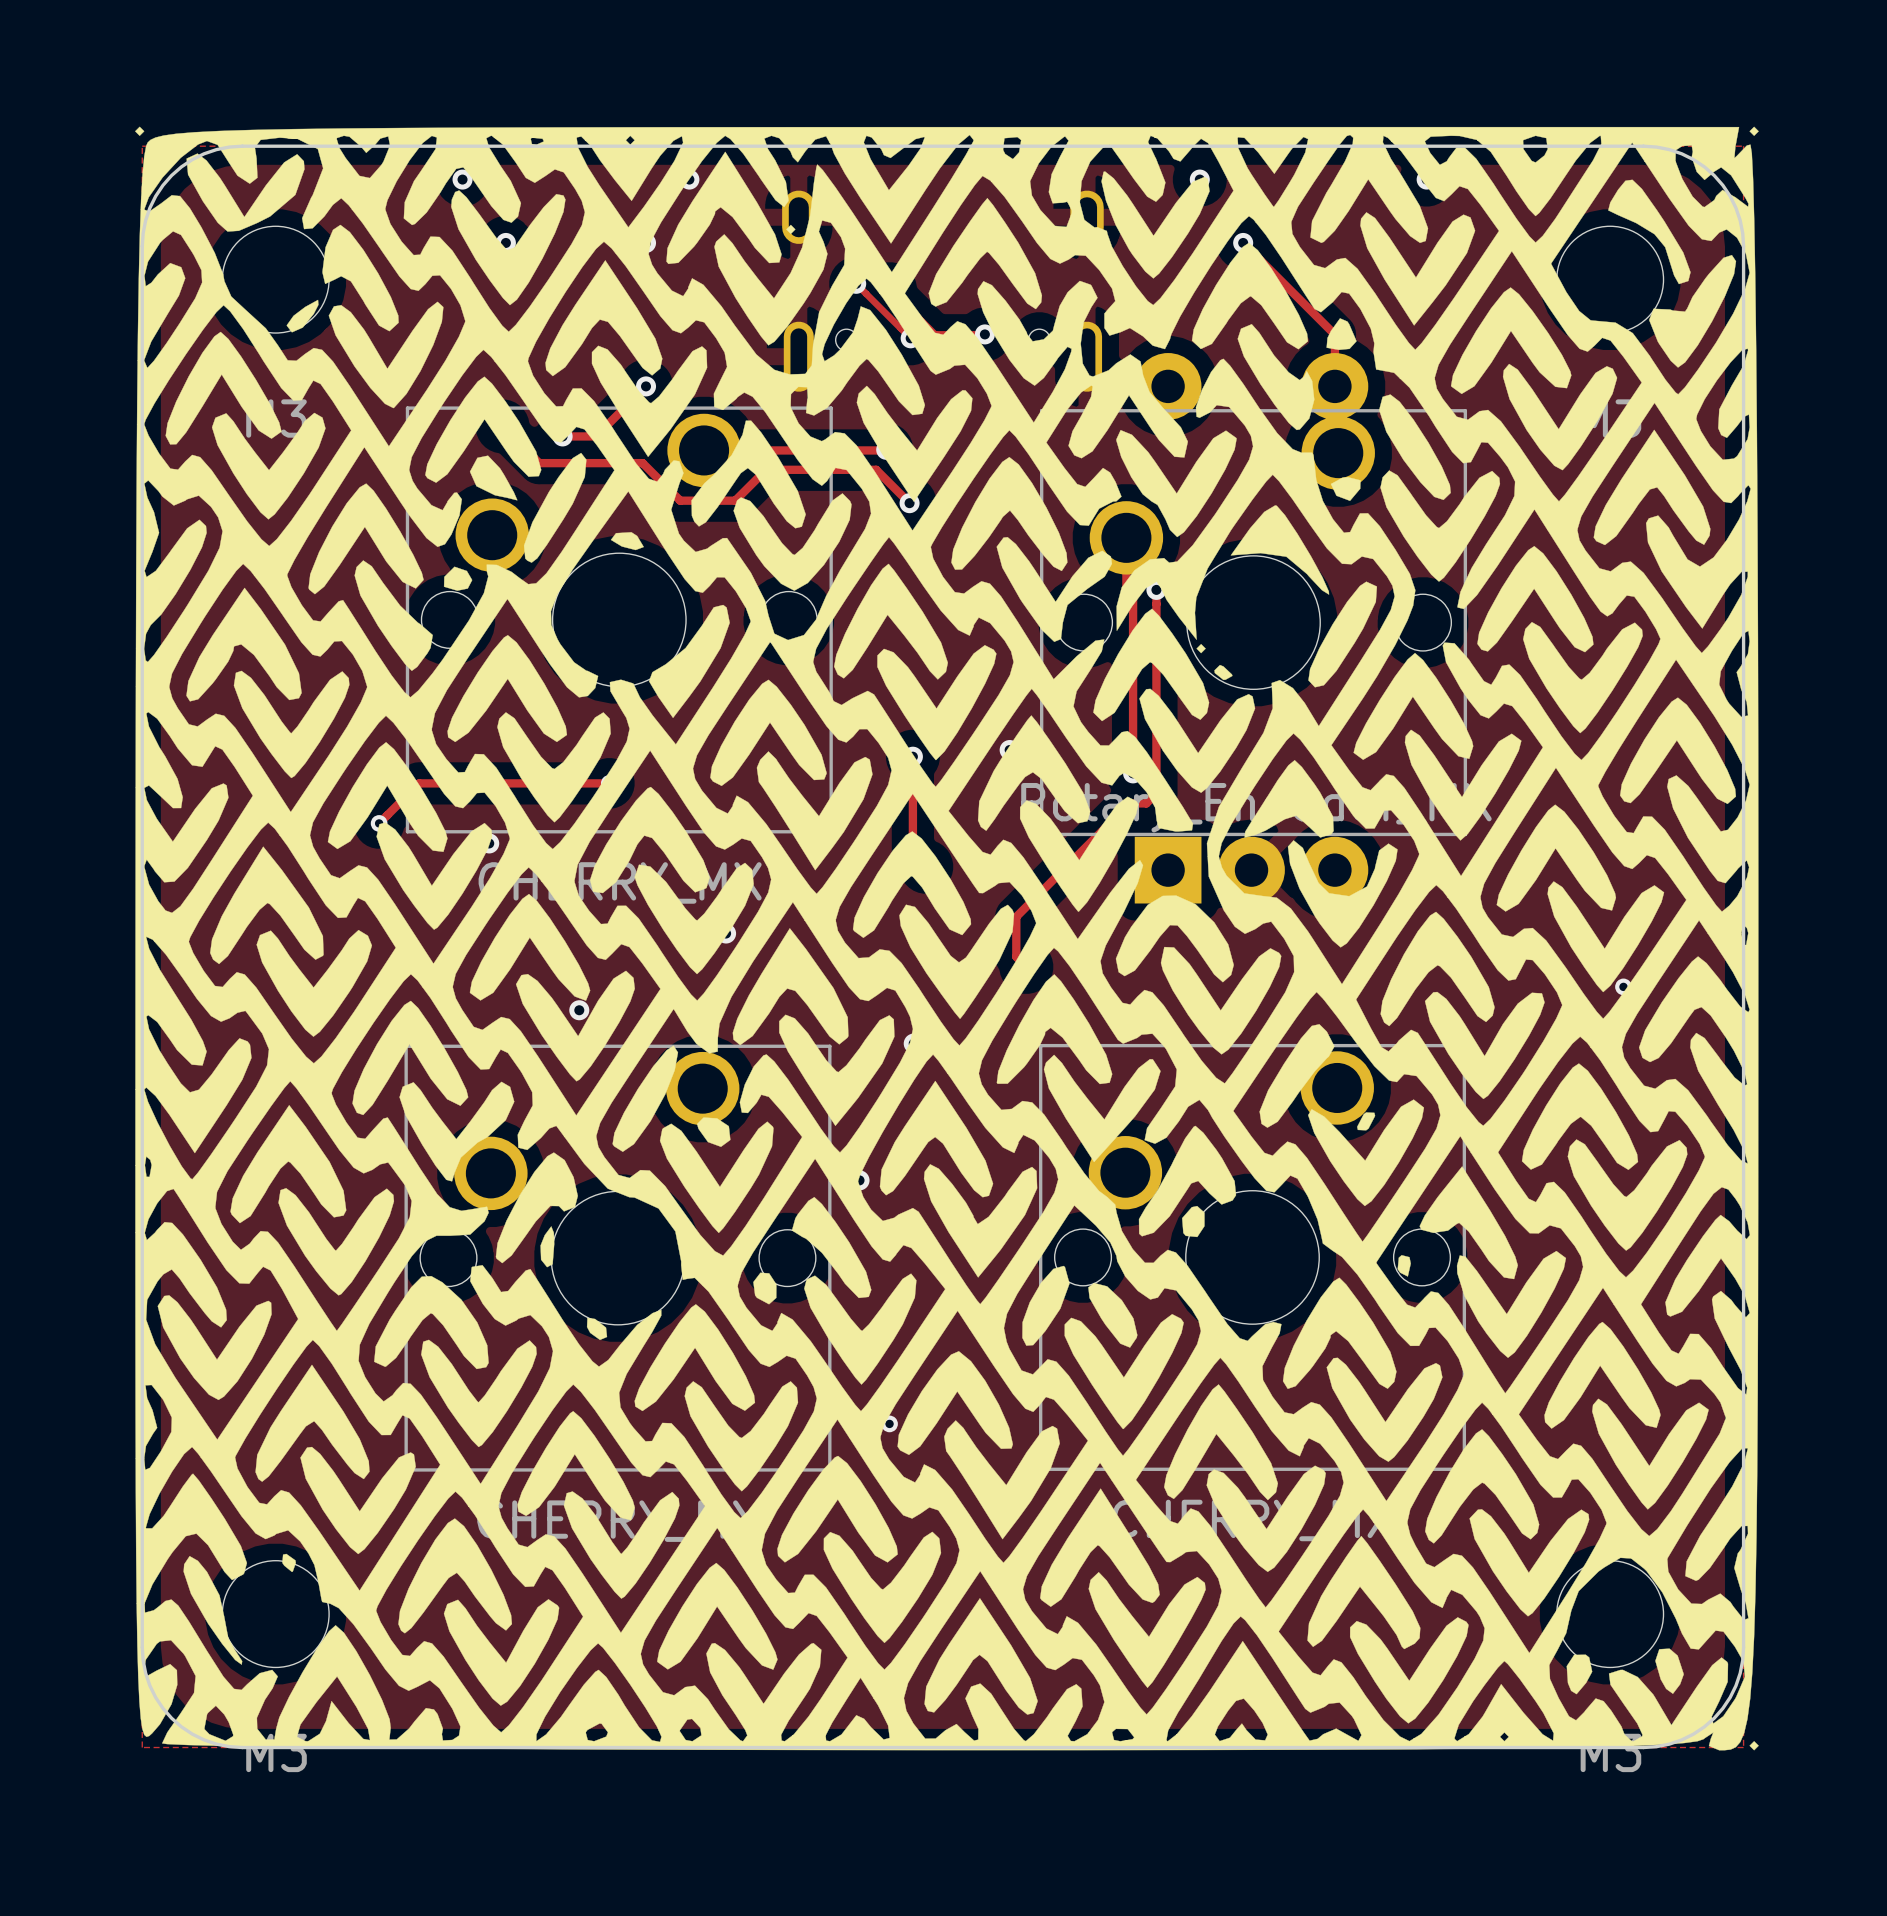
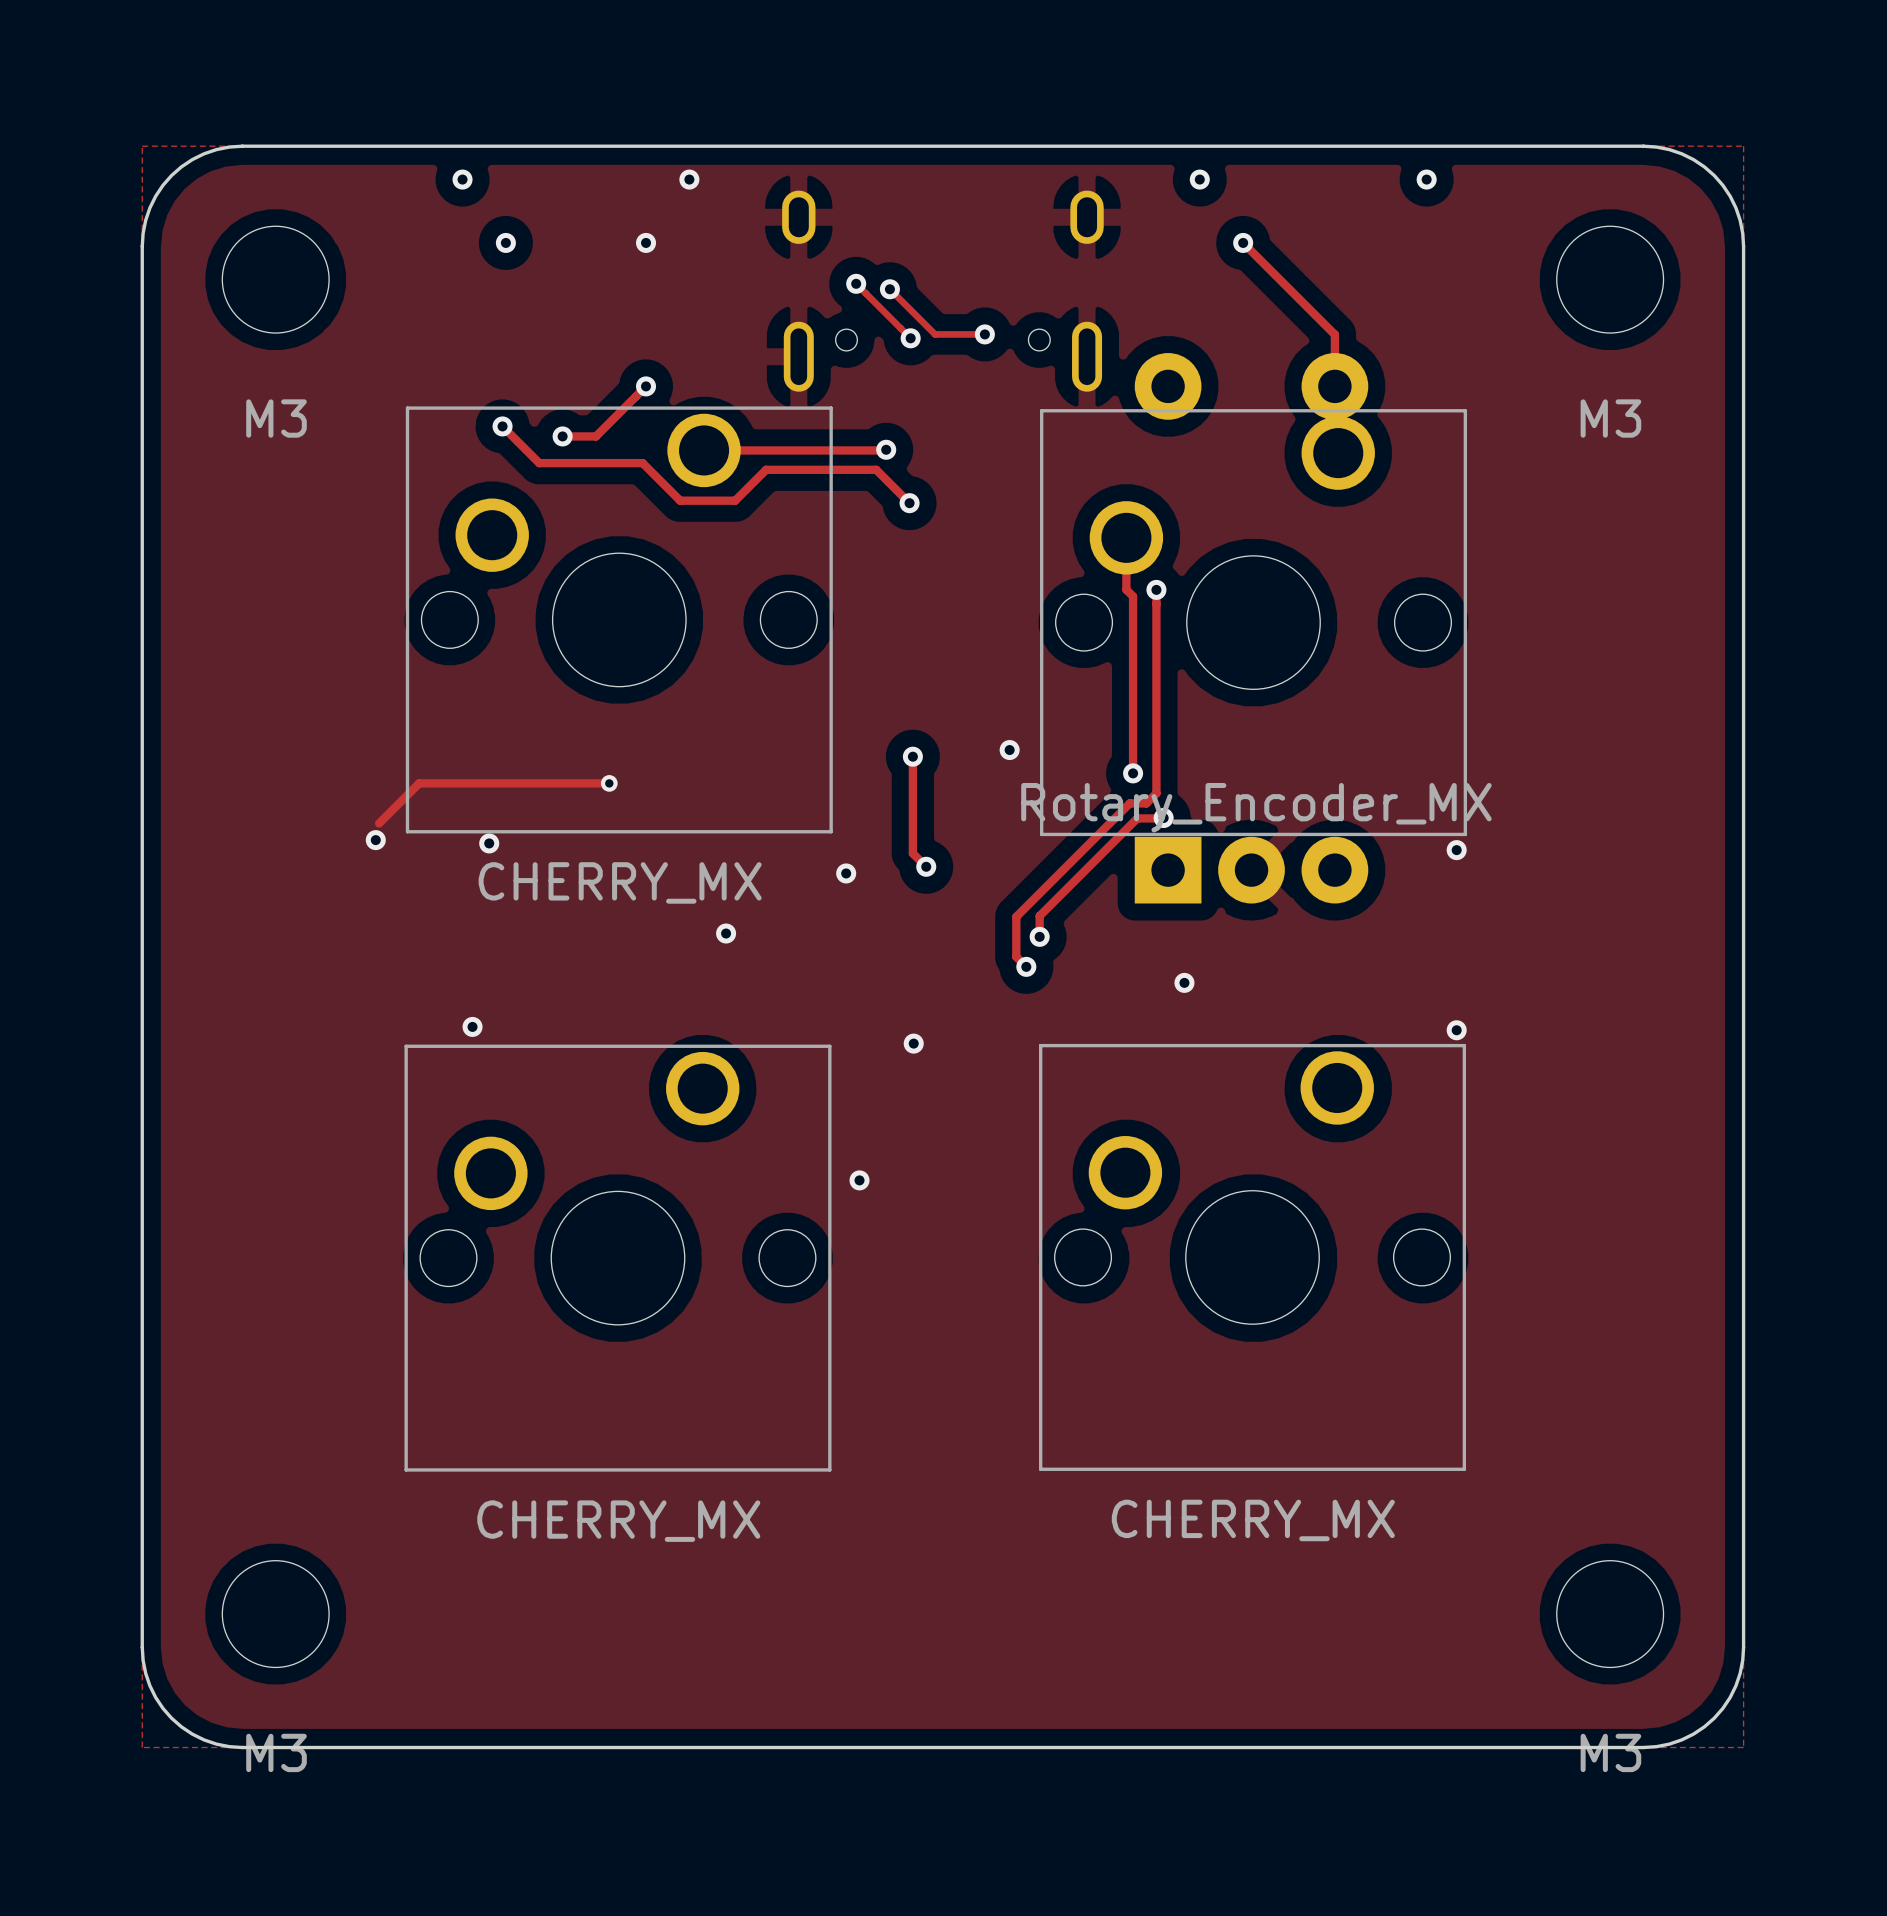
drawing: [135, 126, 1759, 1751] -> none
track: none -> (1163, 818) (1137, 818) (1039, 916) (1039, 936)
via: none -> (1163, 818)
via position: (379, 823) -> (375, 840)
via: none -> (1456, 850)
via: none -> (1039, 936)
via: (1623, 986) -> none
via position: (579, 1010) -> (472, 1026)
via: none -> (1456, 1030)
via: (889, 1423) -> none

